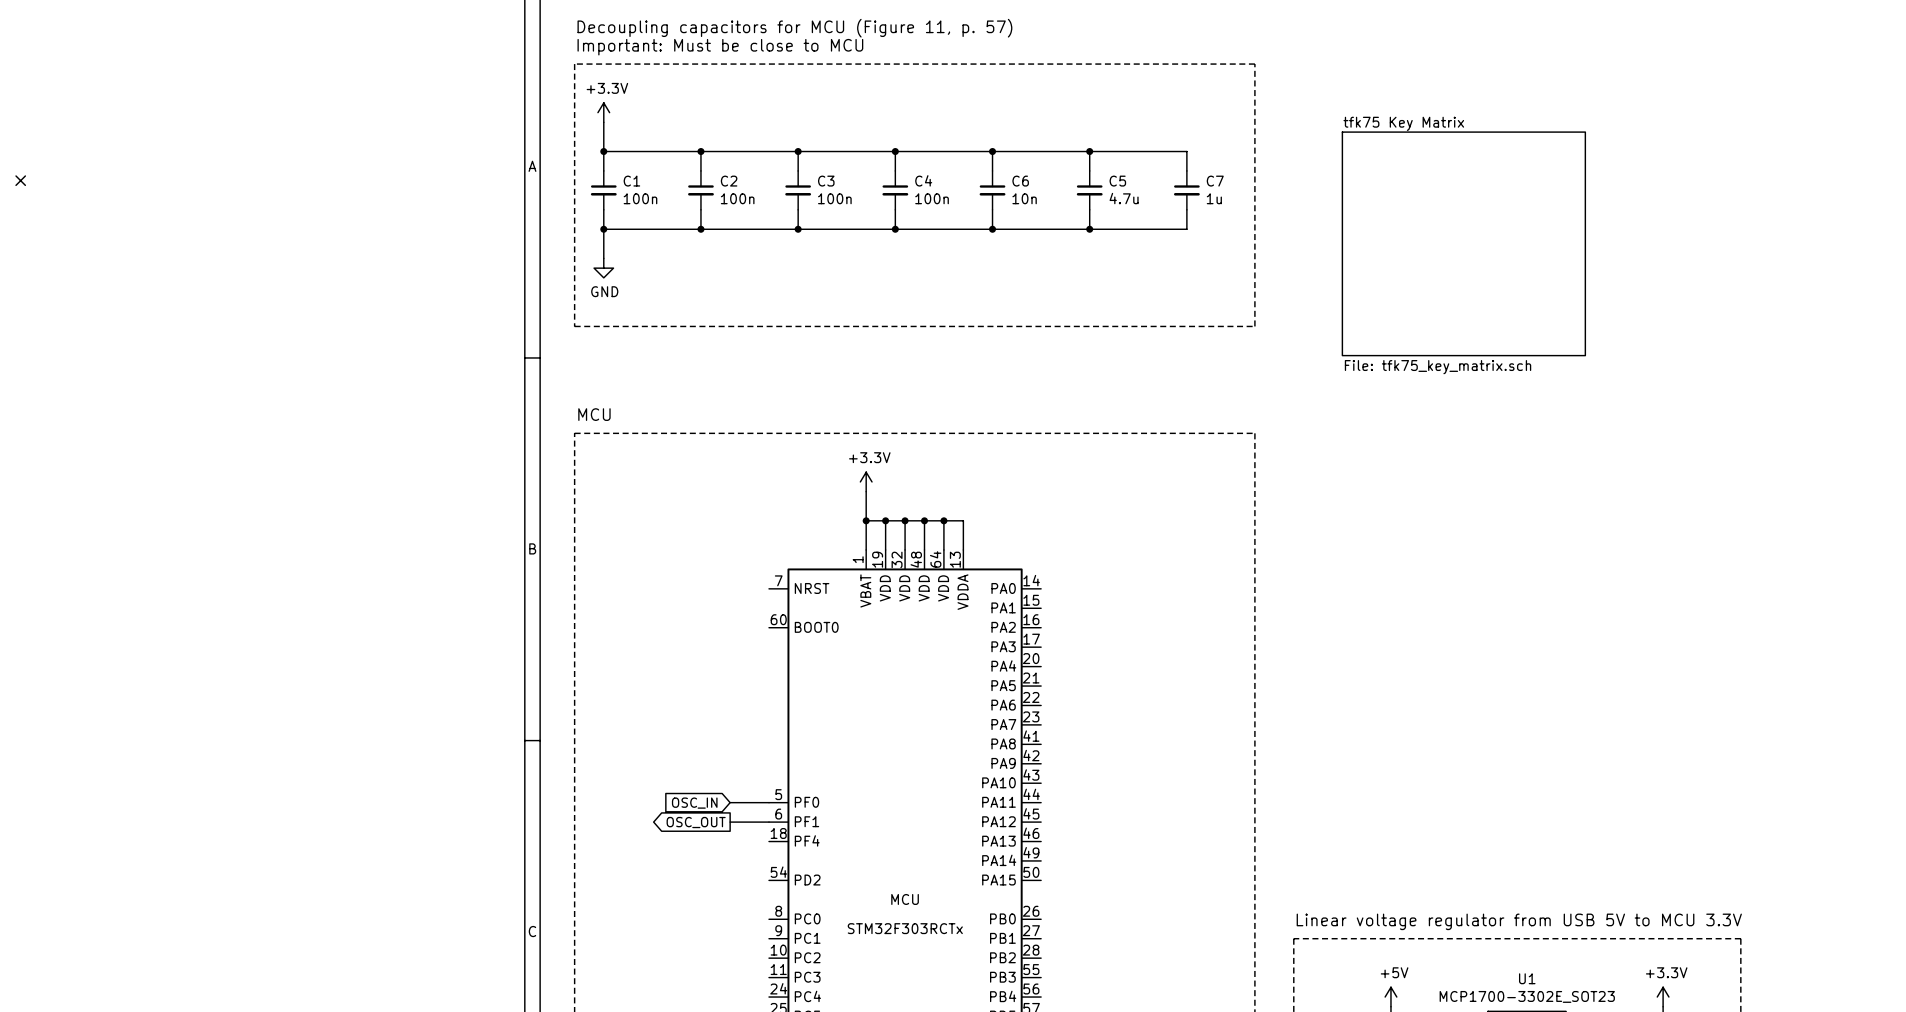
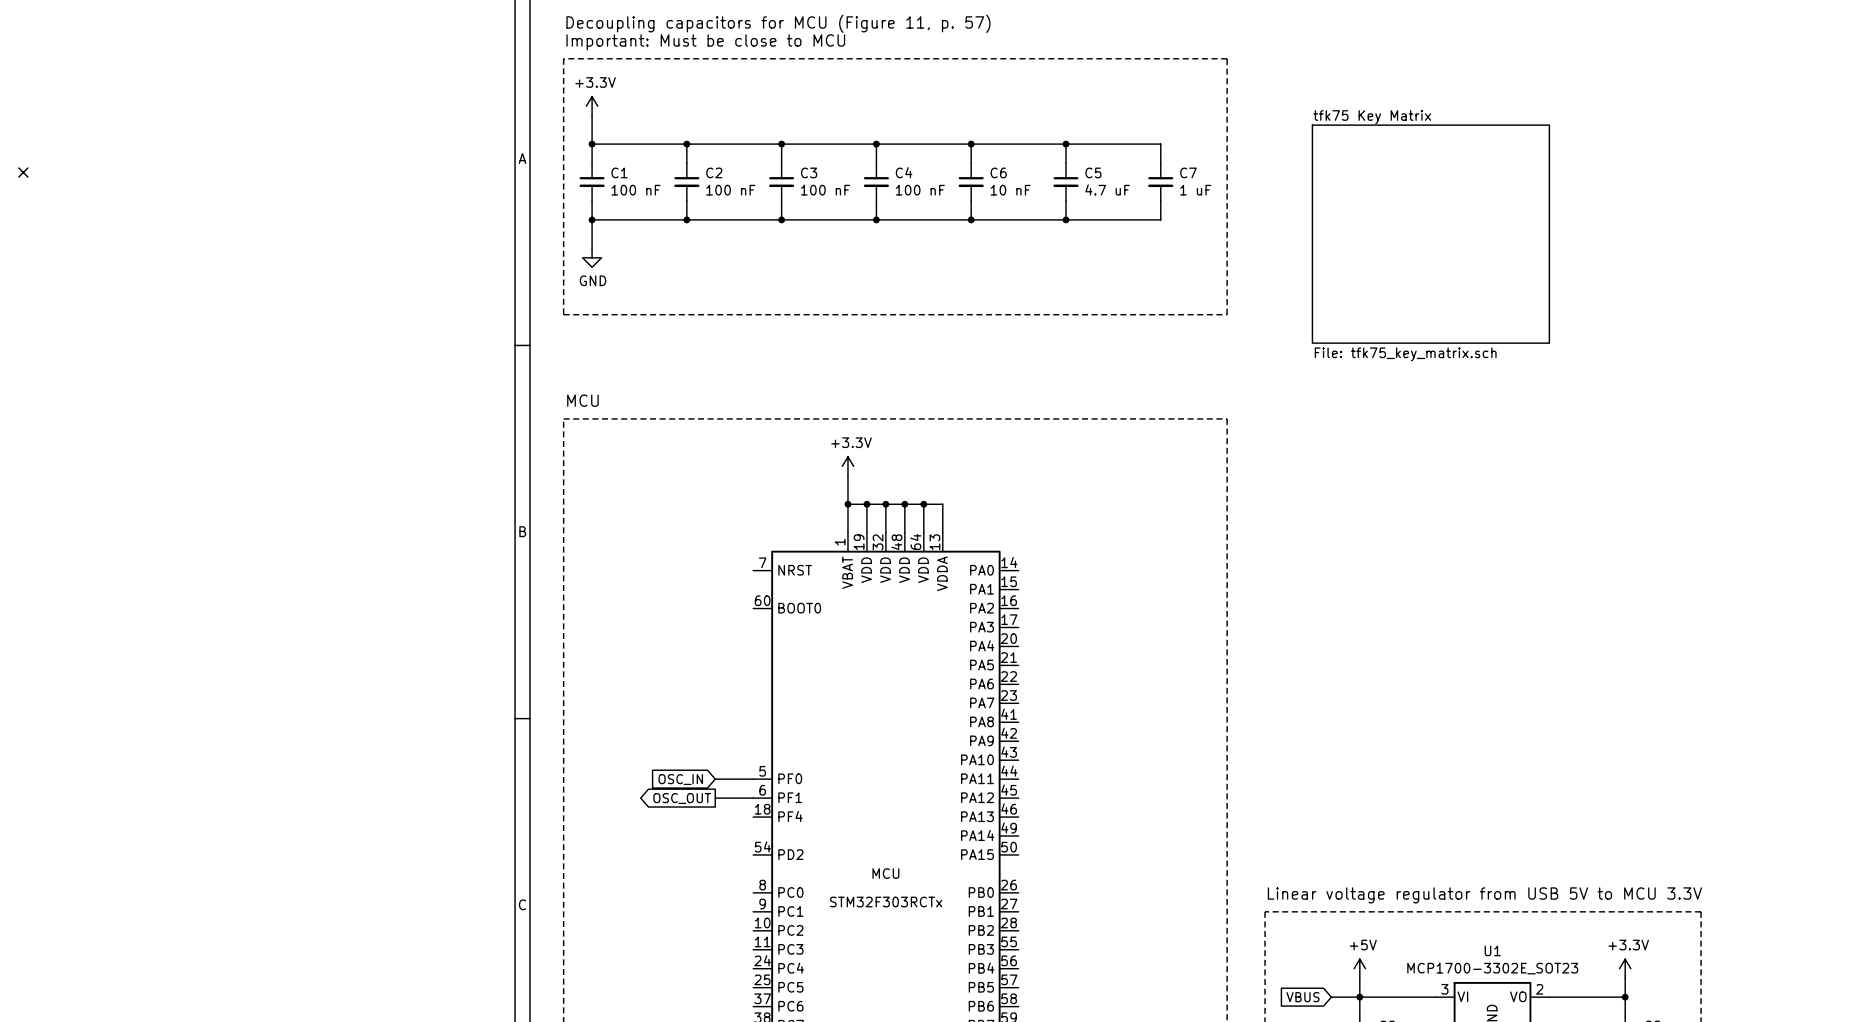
C1 value: 100n (640, 198) -> 100 nF (635, 190)
C2 value: 100n (737, 198) -> 100 nF (730, 190)
C3 value: 100n (834, 198) -> 100 nF (825, 190)
C4 value: 100n (932, 198) -> 100 nF (920, 190)
C6 value: 10n (1024, 198) -> 10 nF (1010, 190)
C5 value: 4.7u (1124, 198) -> 4.7 uF (1107, 189)
C7 value: 1u (1214, 198) -> 1 uF (1195, 190)

